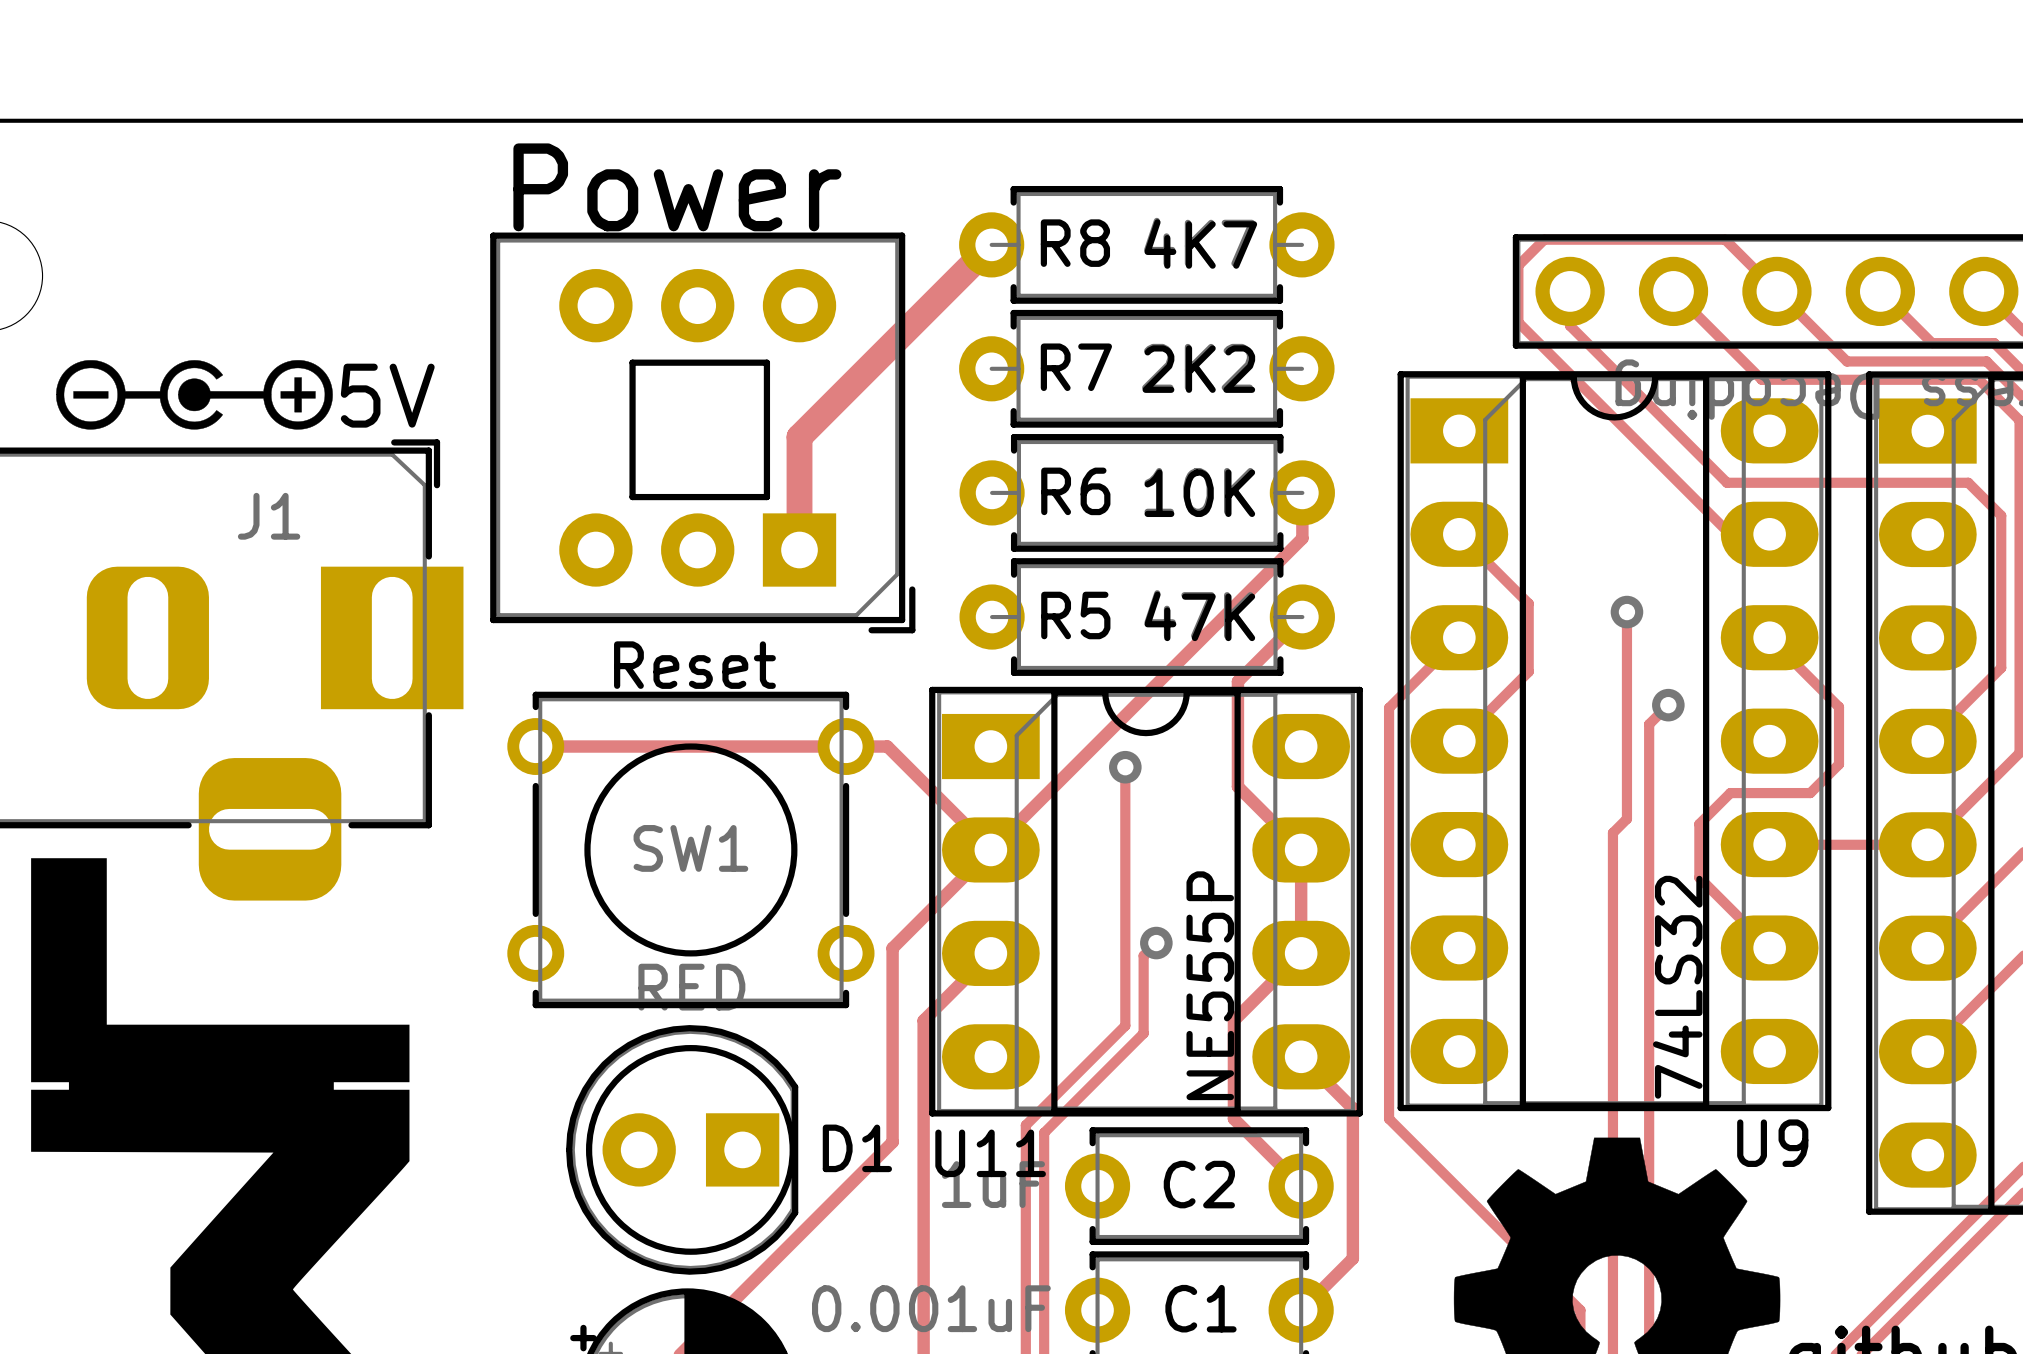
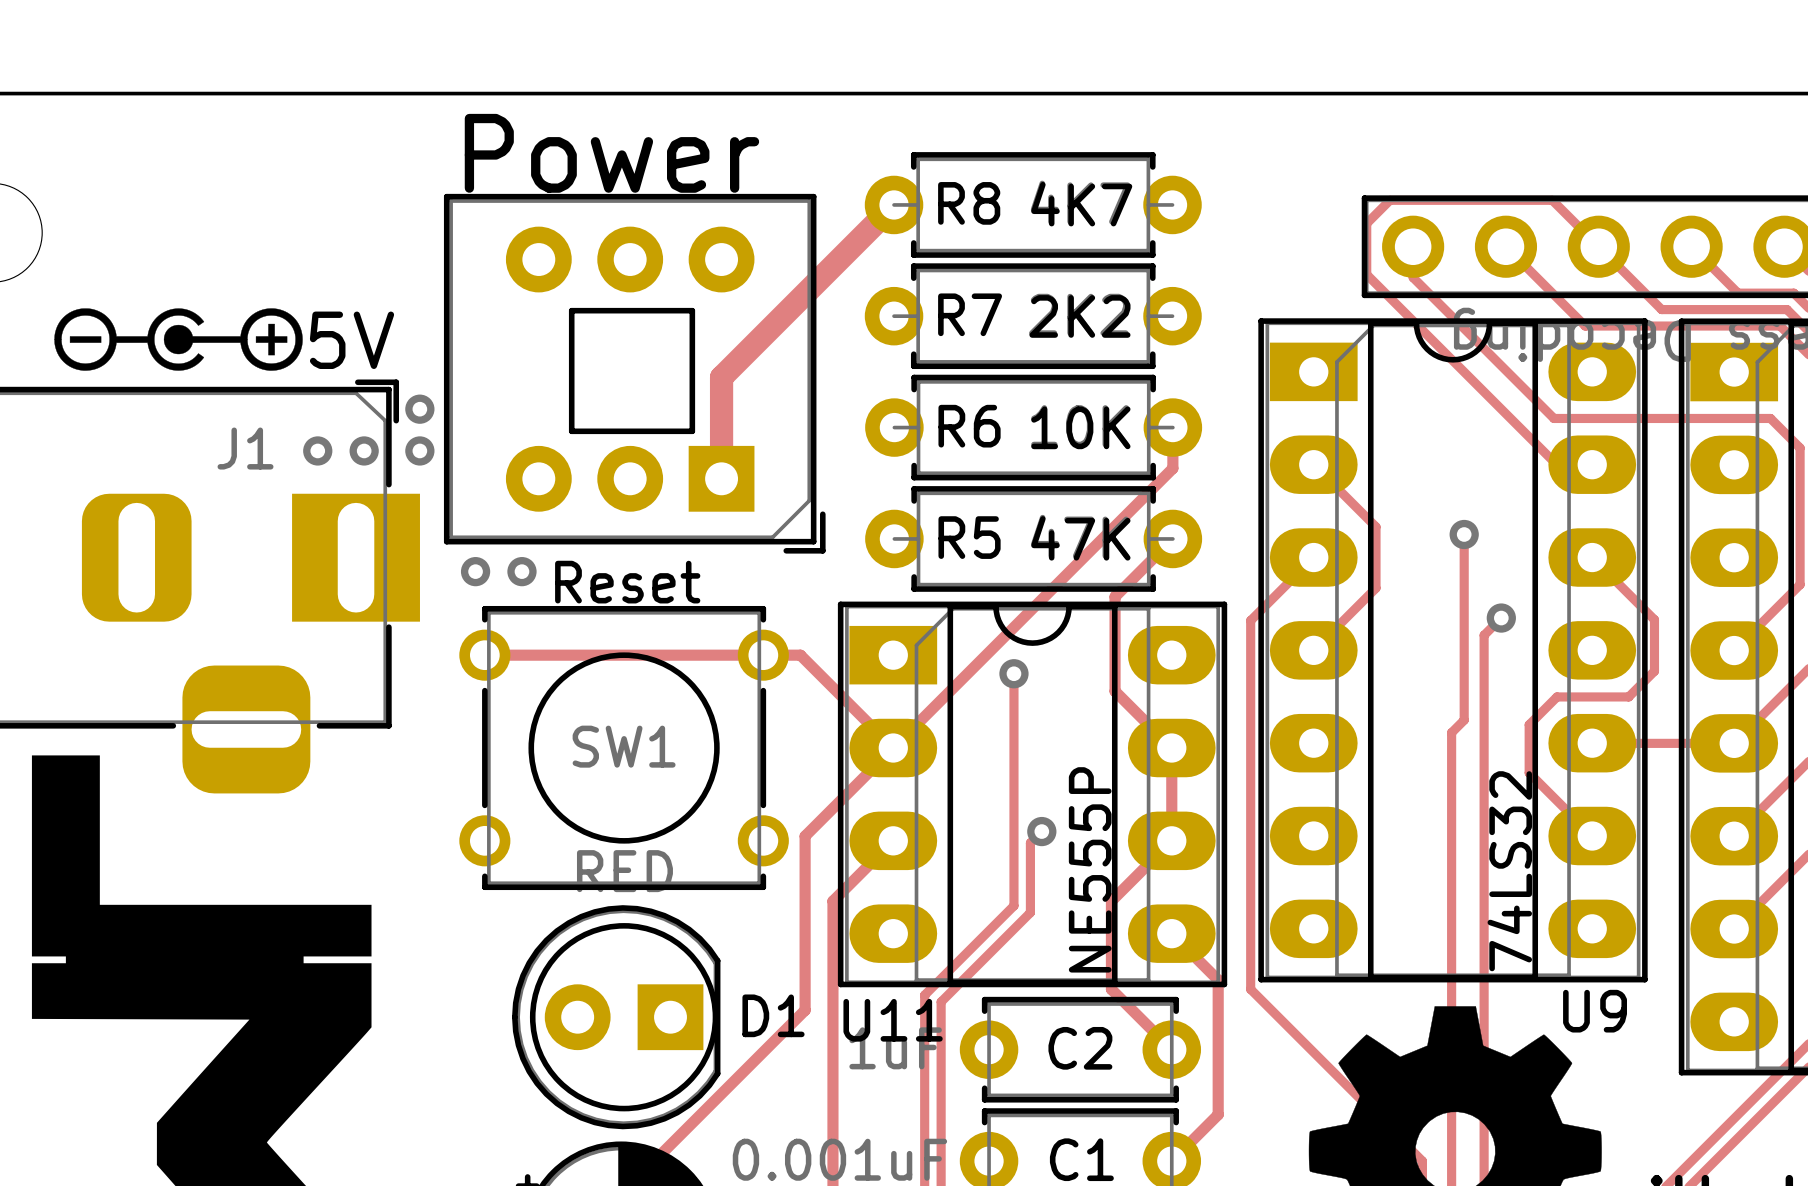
via: none -> (419, 409)
via: none -> (317, 450)
via: none -> (364, 450)
via: none -> (419, 450)
via: none -> (475, 571)
via: none -> (521, 571)

